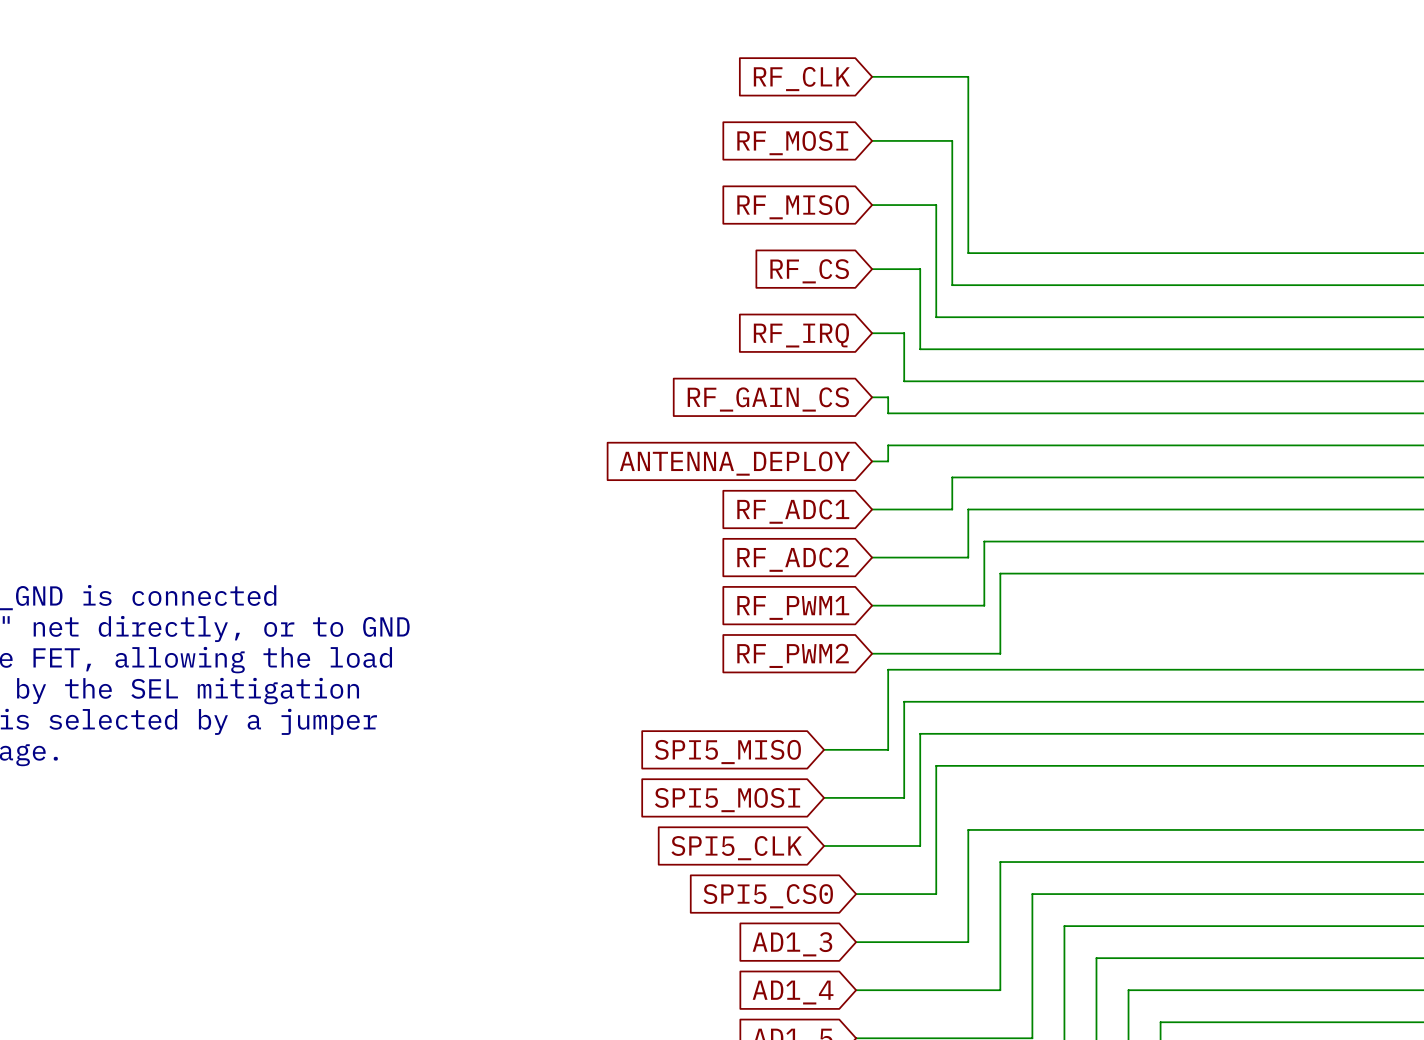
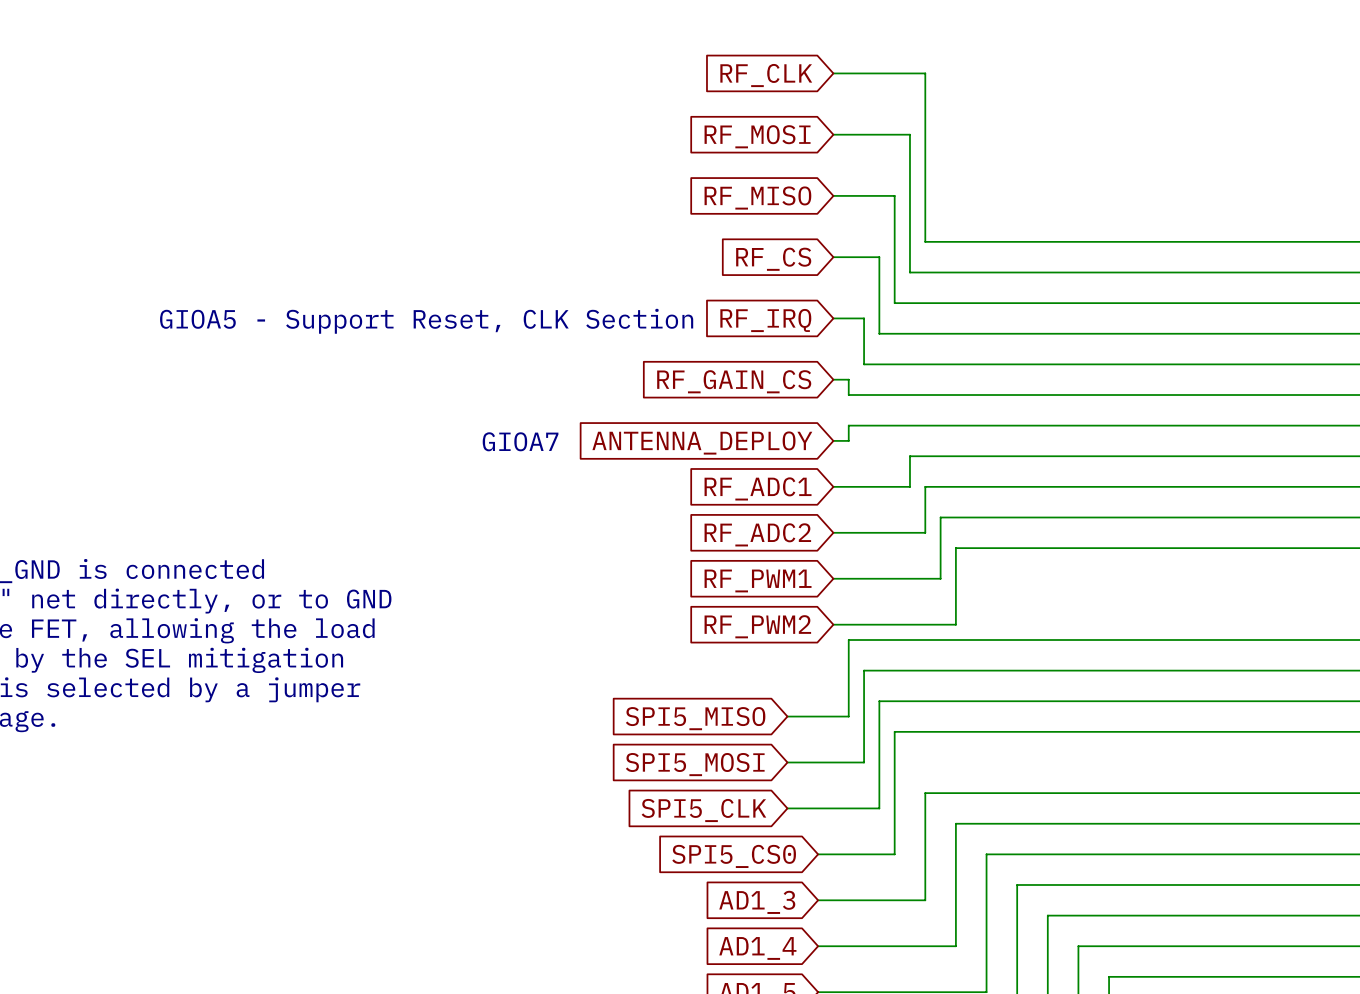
text: none -> GIOA5 - Support Reset, CLK Section (426, 321)
text: none -> GIOA7 (520, 441)

